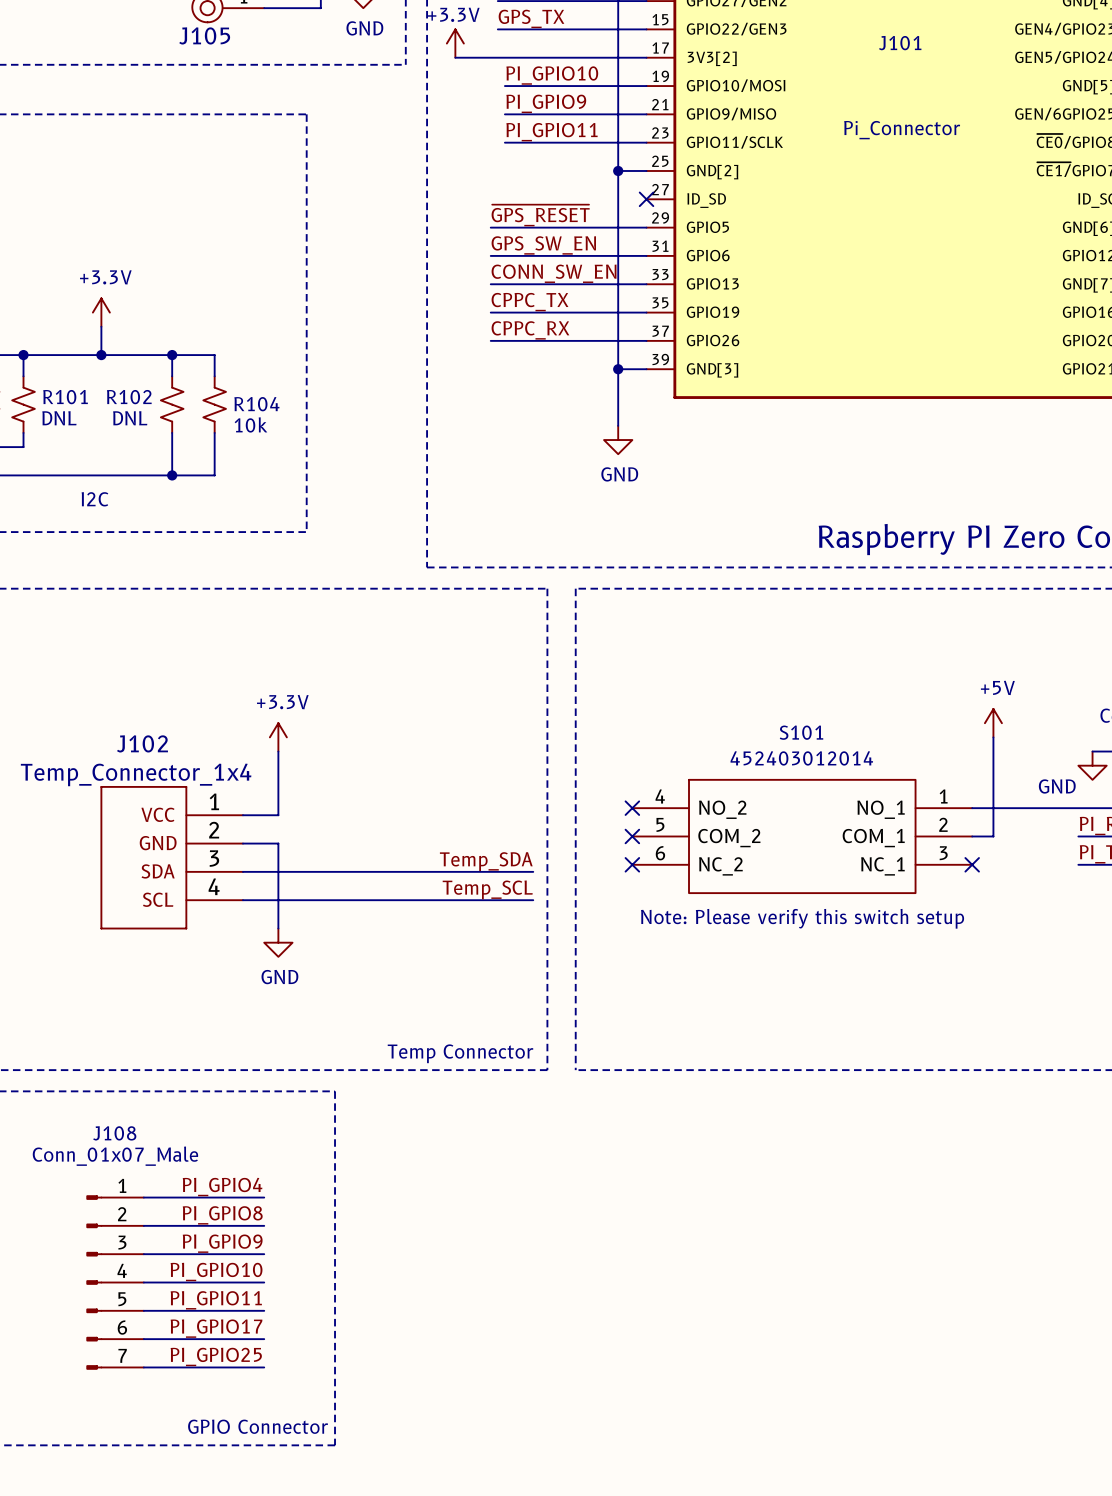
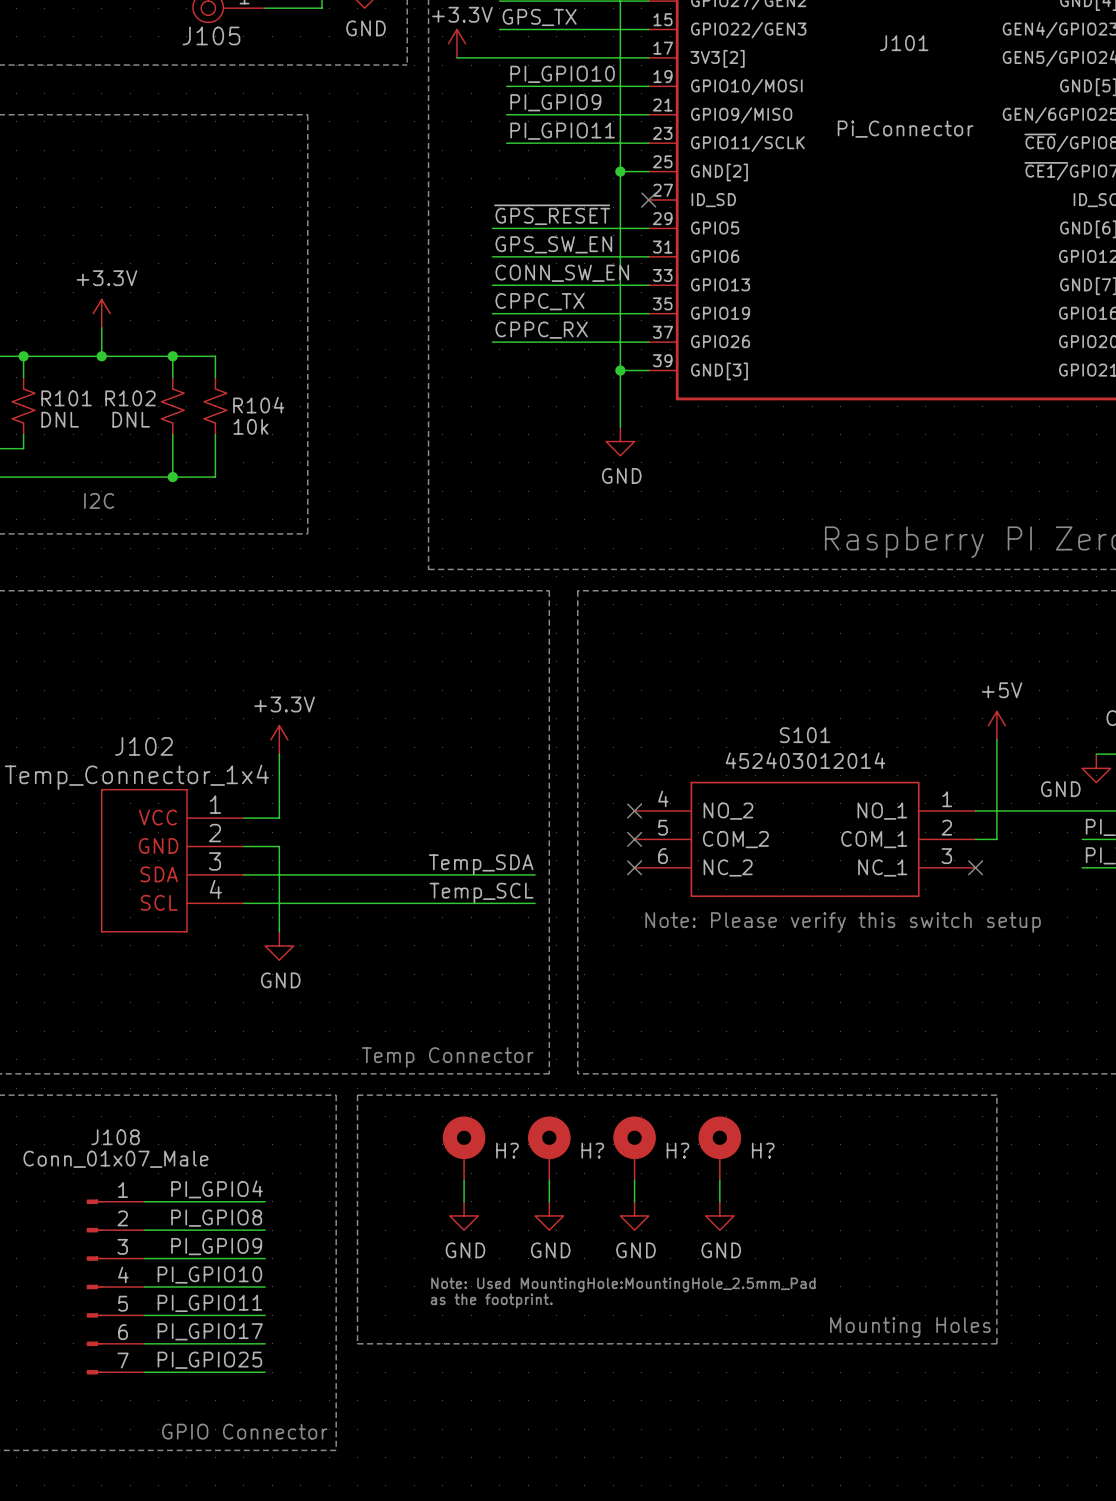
line: none -> (357, 1095) (996, 1095) (996, 1343) (357, 1343) (357, 1095)
H?: none -> (464, 1148)
H?: none -> (549, 1148)
H?: none -> (634, 1148)
H?: none -> (719, 1148)
wire: none -> (464, 1180) (464, 1201)
wire: none -> (549, 1180) (549, 1201)
wire: none -> (634, 1180) (634, 1201)
wire: none -> (719, 1180) (719, 1201)
power symbol: none -> GND (464, 1215)
power symbol: none -> GND (549, 1215)
power symbol: none -> GND (634, 1215)
power symbol: none -> GND (719, 1215)
text: none -> Note: Used MountingHole:MountingHole_2.5mm_Pad (623, 1284)
text: none -> as the footprint. (491, 1300)
text: none -> Mounting Holes (910, 1327)

